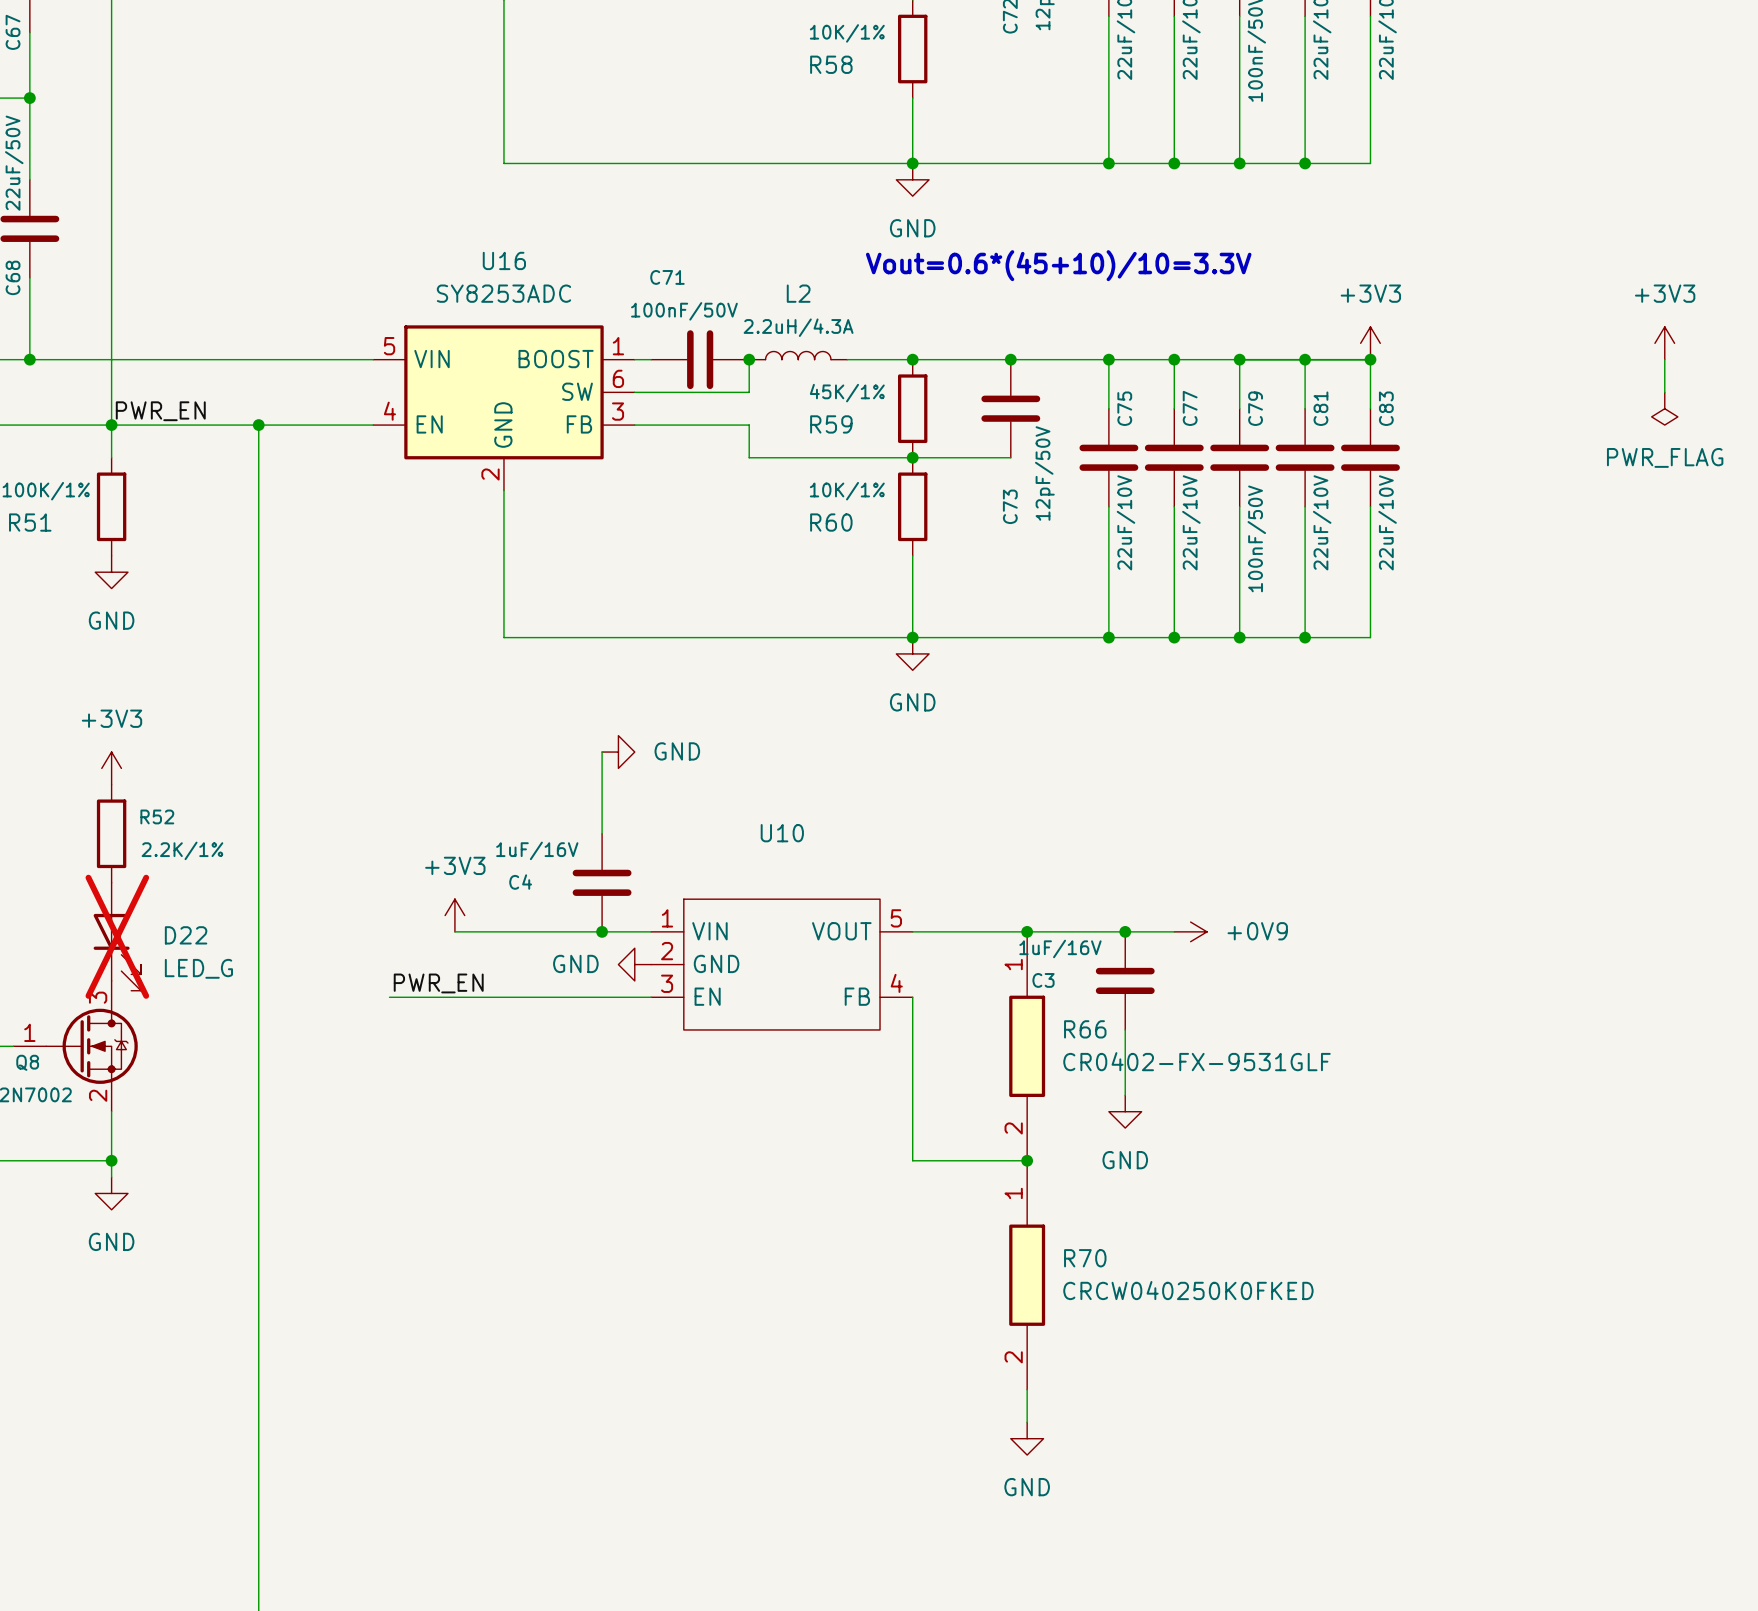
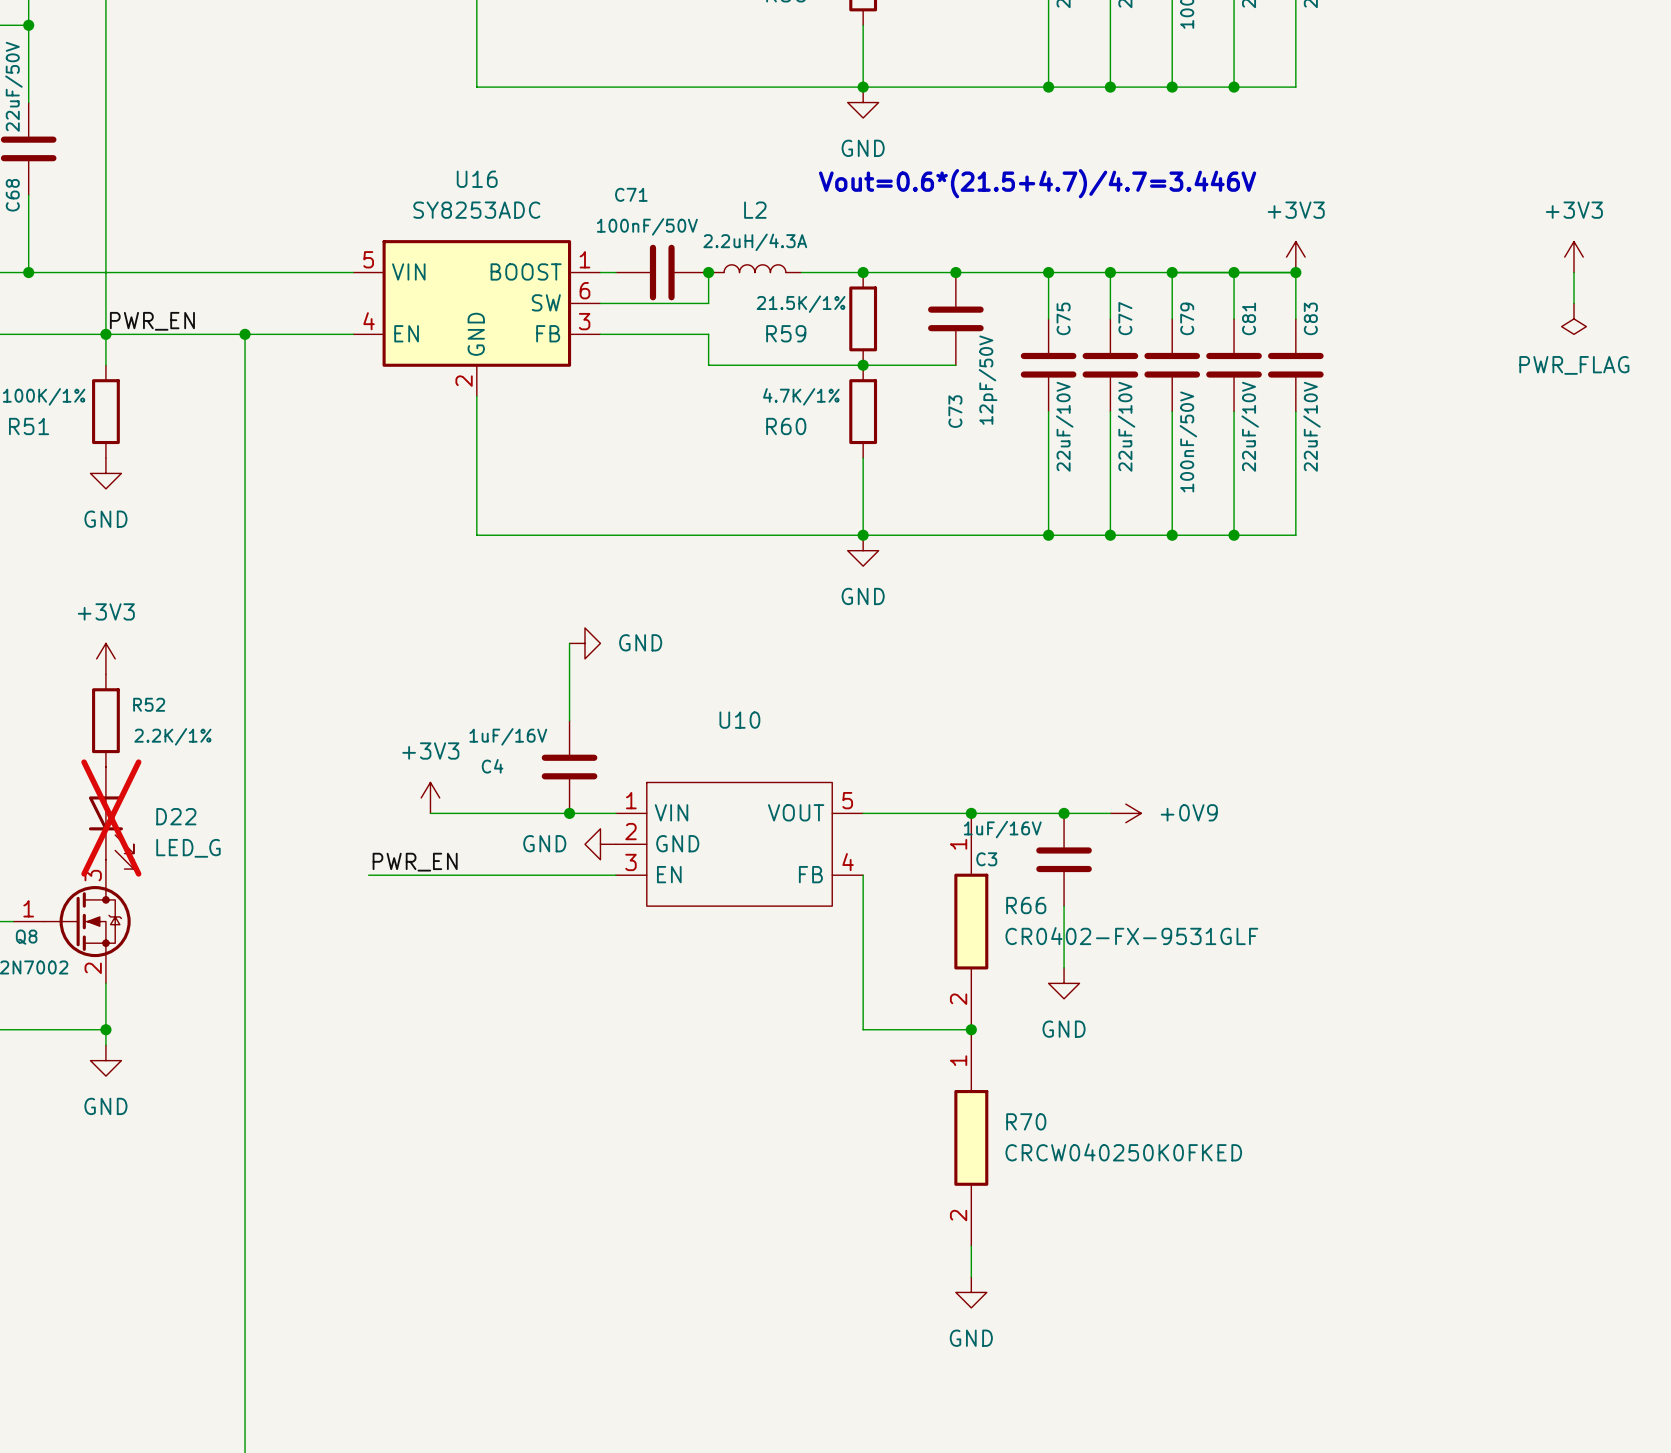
text: Vout=0.6*(45+10)/10=3.3V (1058, 265) -> Vout=0.6*(21.5+4.7)/4.7=3.446V (1037, 183)
R59 value: 45K/1% (847, 393) -> 21.5K/1% (801, 304)
R60 value: 10K/1% (847, 491) -> 4.7K/1% (801, 396)

